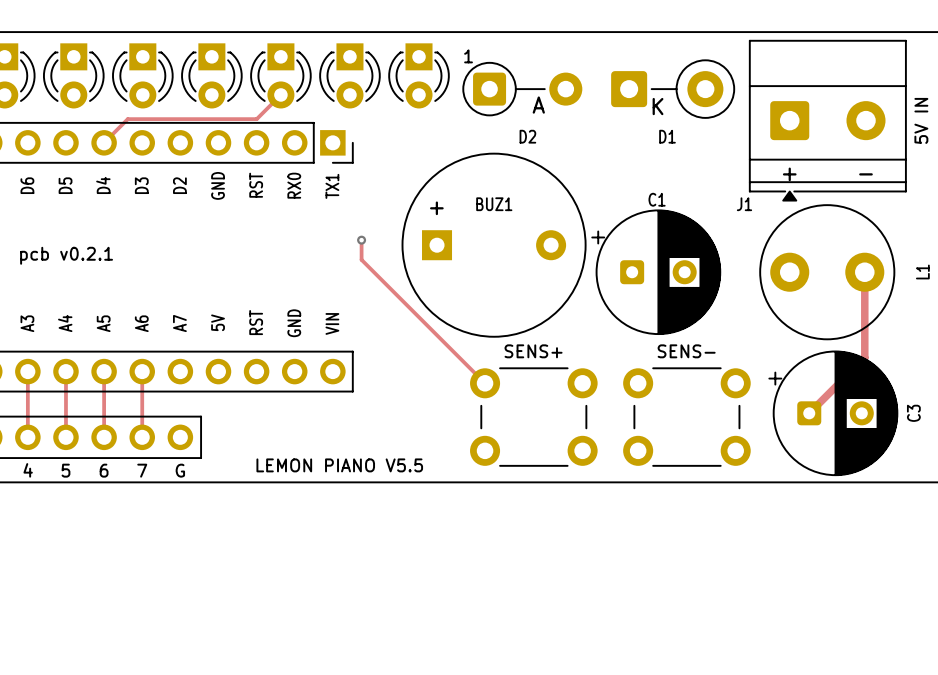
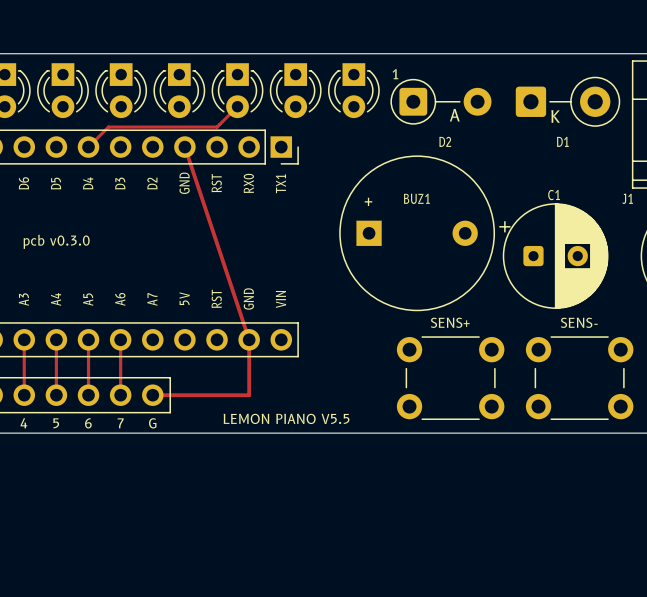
track: none -> (184, 147) (249, 339) (249, 395) (152, 395)
track: (361, 240) (361, 259) (485, 383) -> none
via: (361, 240) -> none
text: pcb v0.2.1 (66, 255) -> pcb v0.3.0 (56, 241)

